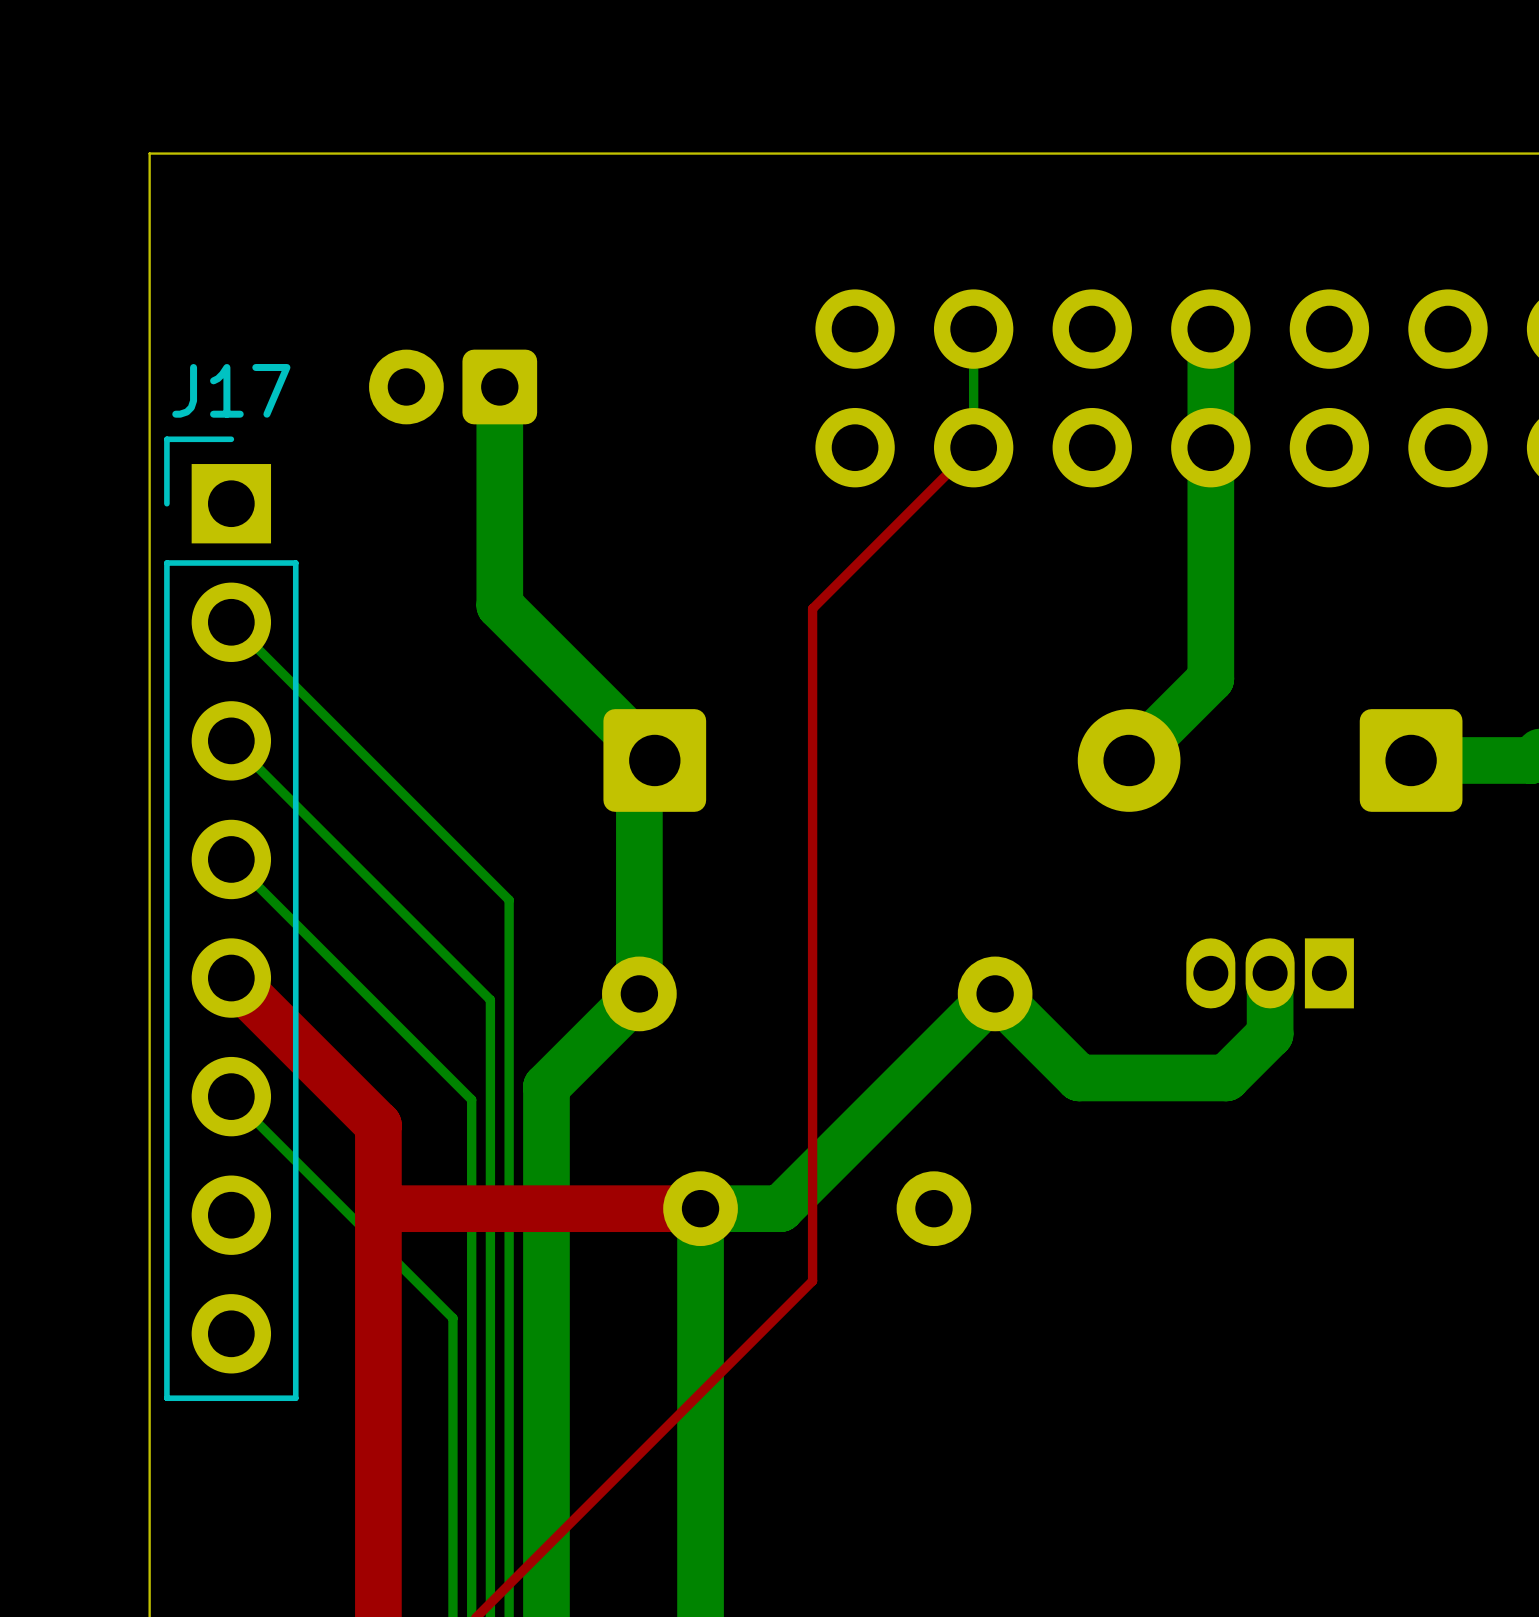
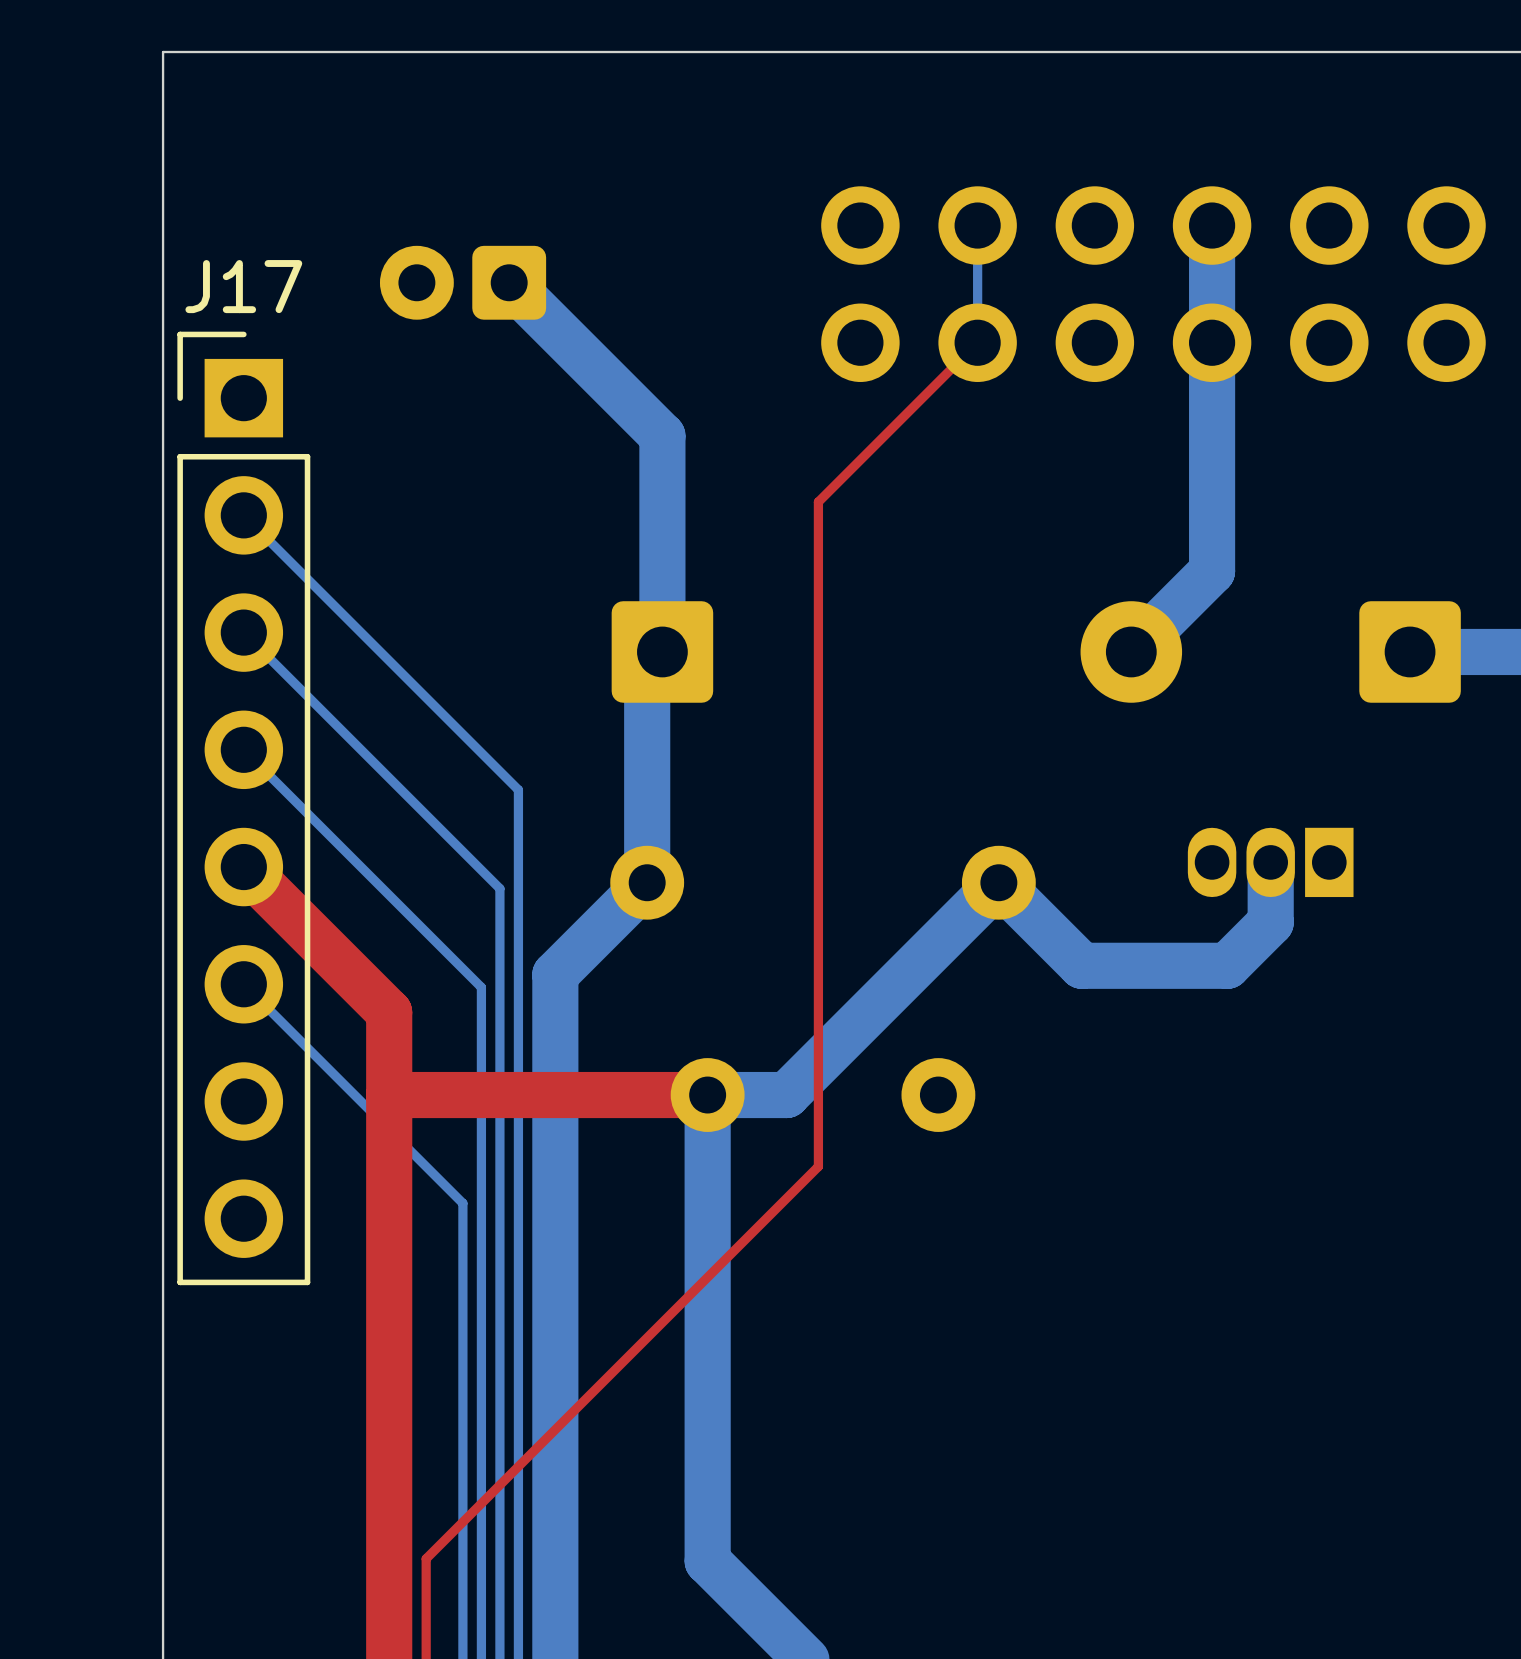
bottom track: (499, 386) (499, 605) (654, 760) -> (509, 282) (662, 435) (662, 651)

